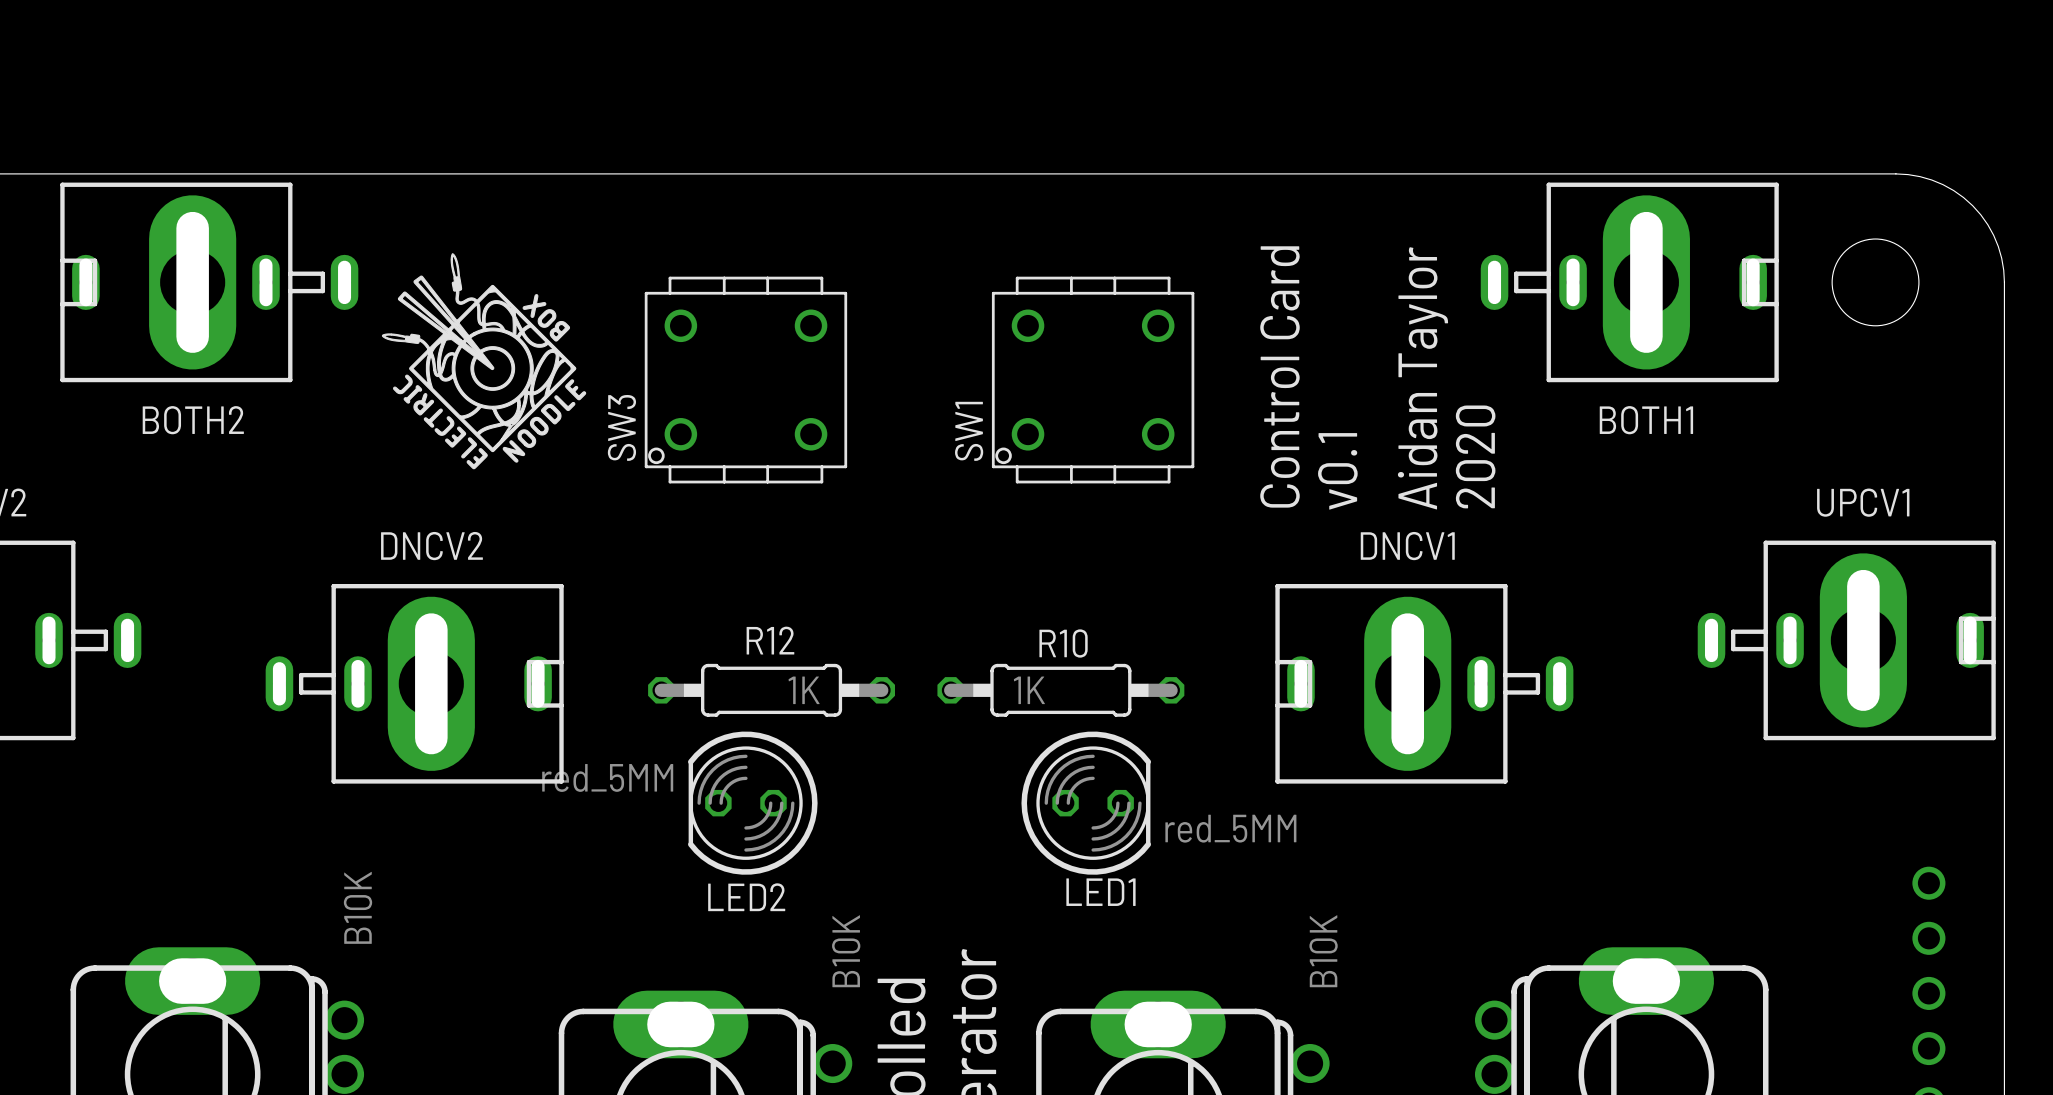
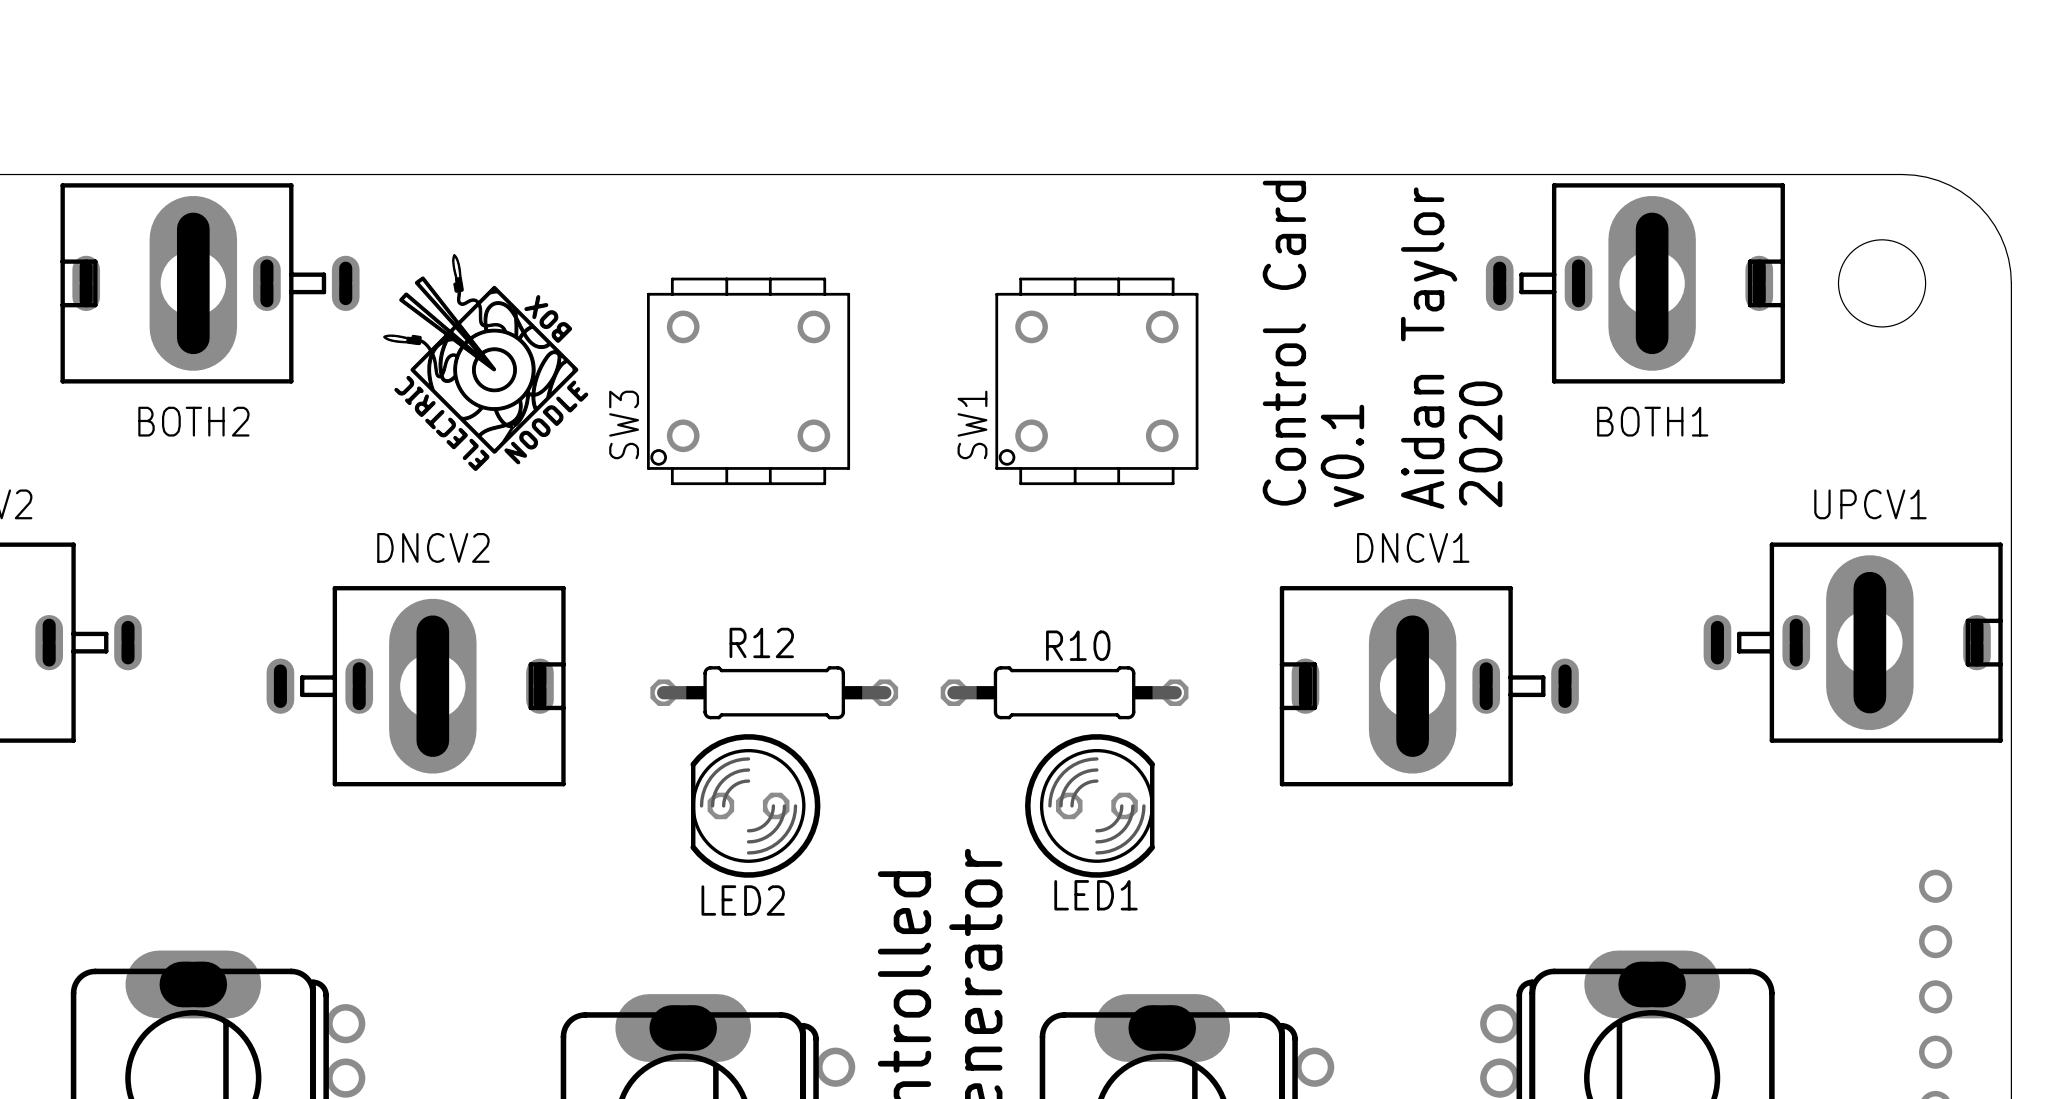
R12 value: 1K (804, 690) -> none
R10 value: 1K (1029, 690) -> none
LED2 value: red_5MM (607, 777) -> none
LED1 value: red_5MM (1230, 828) -> none
part value: B10K (358, 907) -> none
part value: B10K (846, 951) -> none
part value: B10K (1323, 951) -> none

